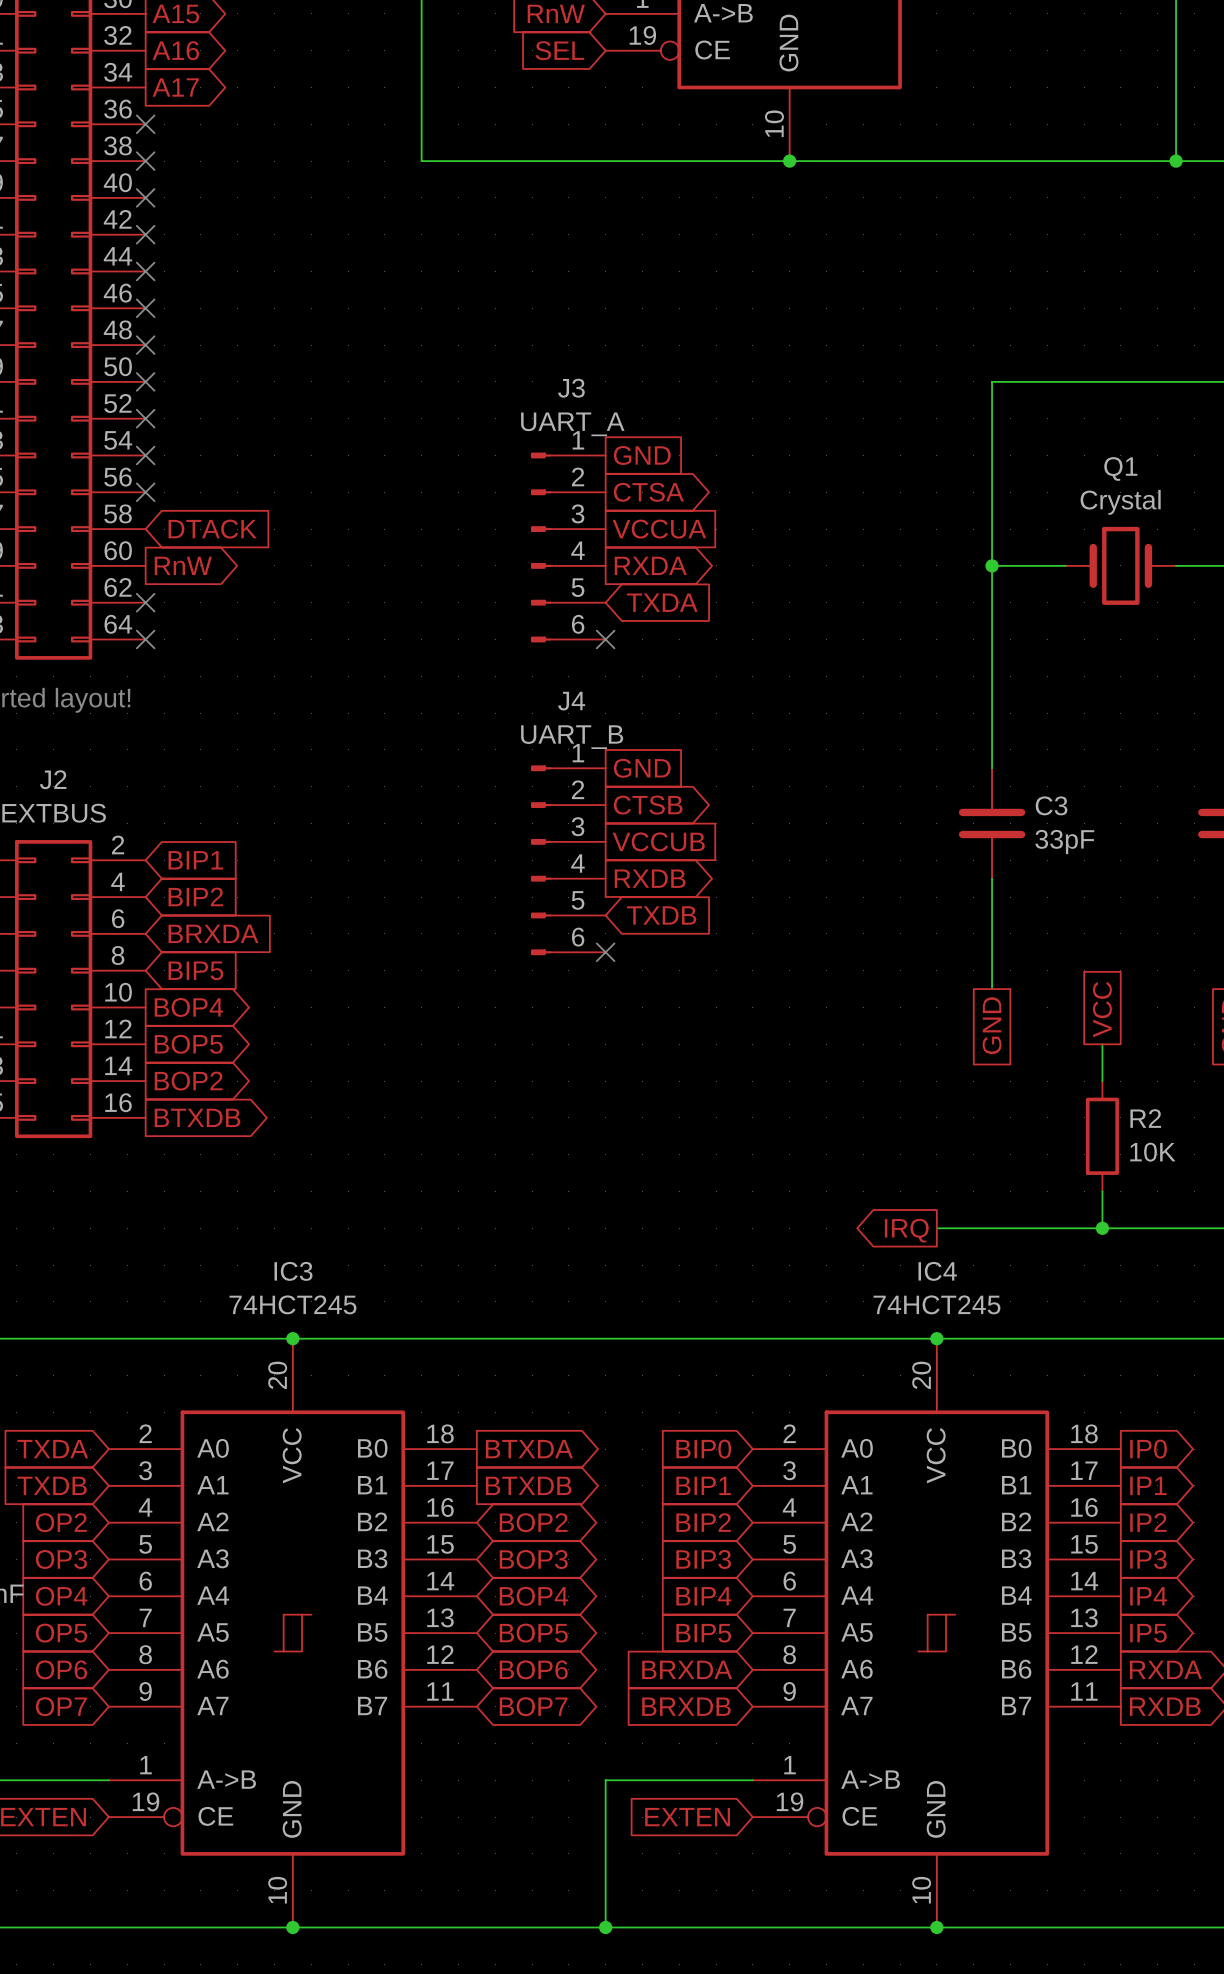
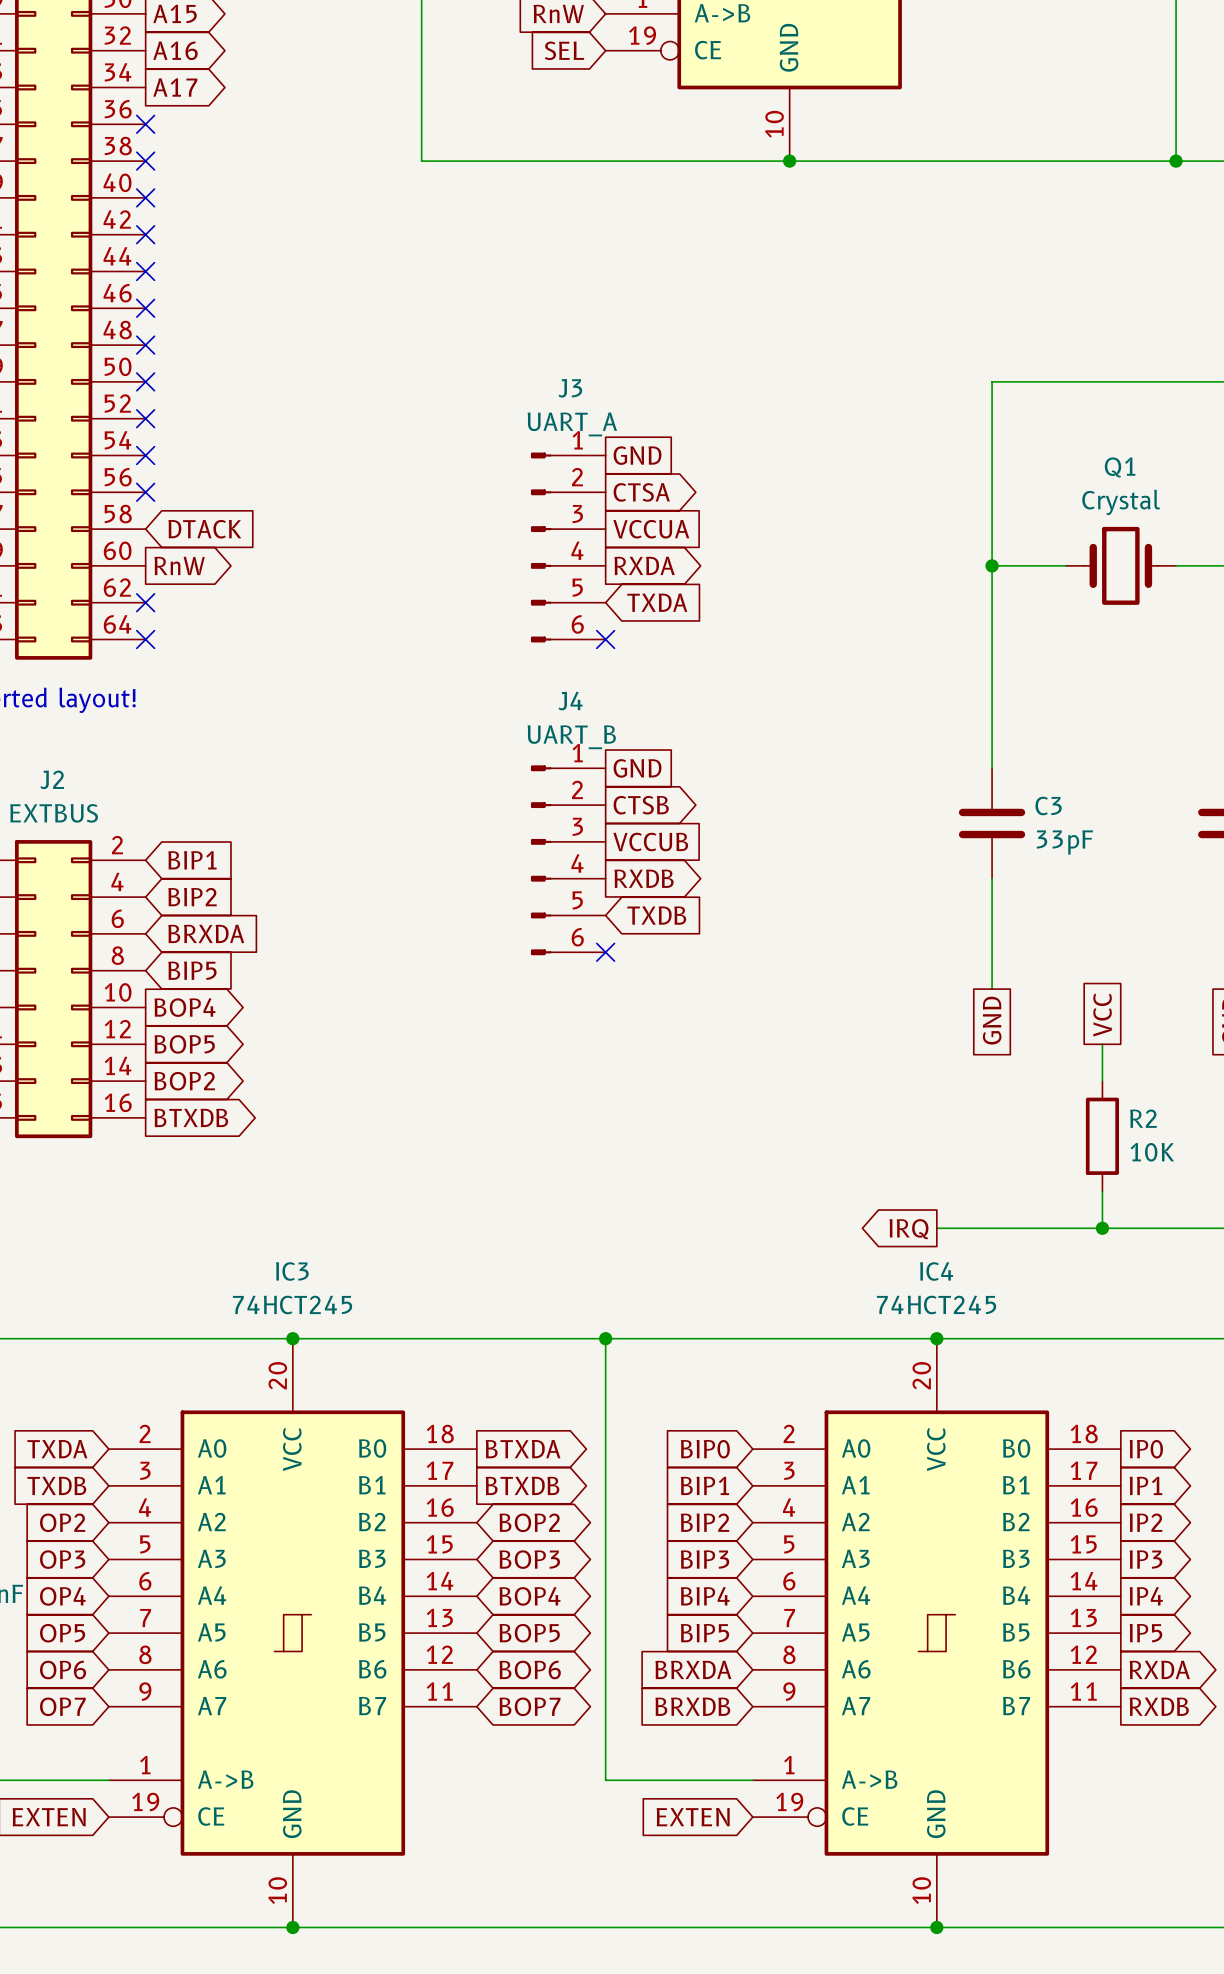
junction: none -> (605, 1338)
wire: (605, 1780) (605, 1927) -> (605, 1780) (605, 1338)
junction: (605, 1927) -> none

